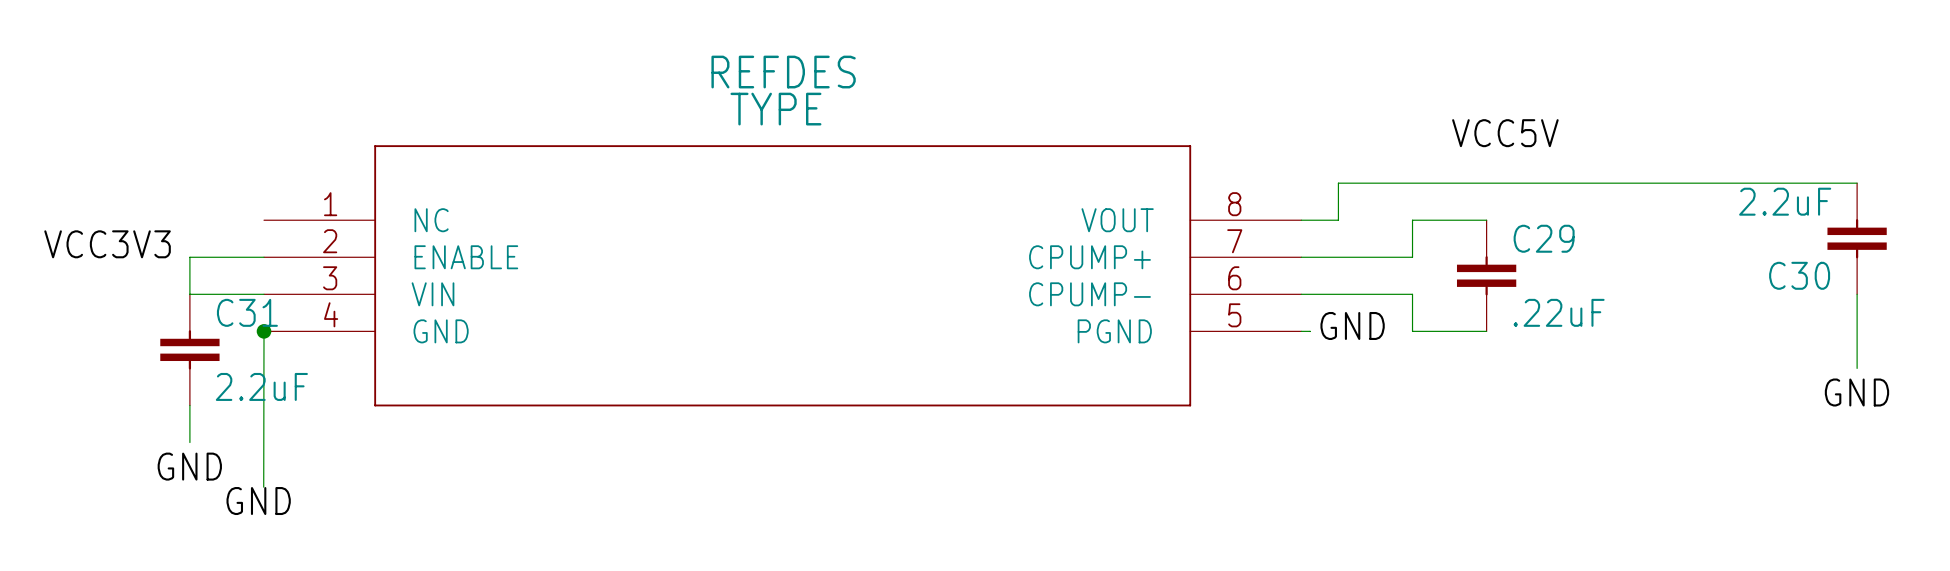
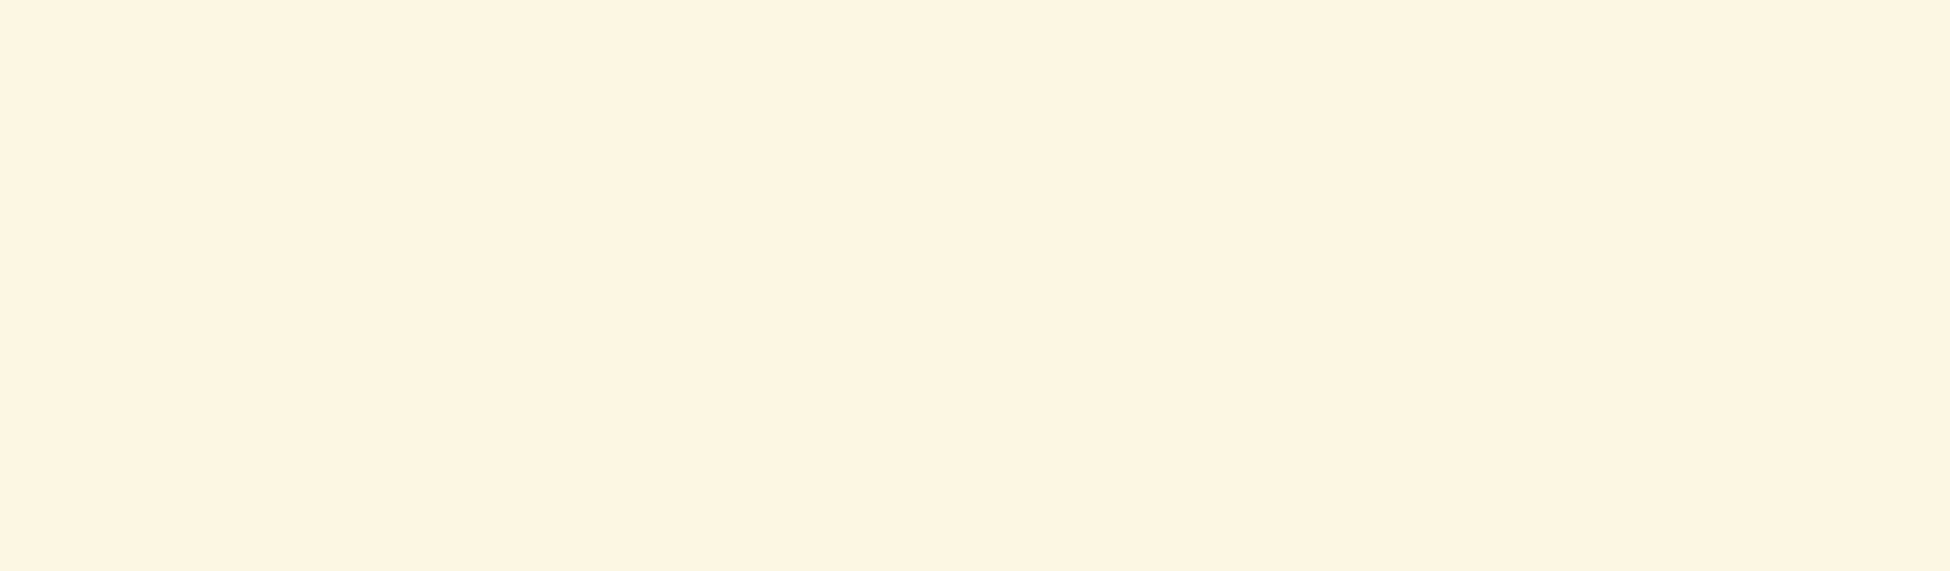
label: VCC5V (1505, 133) -> none
wire: (1857, 183) (1338, 183) (1338, 220) (1301, 220) -> none
wire: (1486, 220) (1412, 220) (1412, 257) (1301, 257) -> none
C30: 2.2uF (1857, 238) -> none
label: VCC3V3 (107, 244) -> none
wire: (264, 257) (189, 257) (189, 294) (264, 294) -> none
part: (782, 275) -> none
C29: .22uF (1486, 275) -> none
wire: (1301, 294) (1412, 294) (1412, 331) (1486, 331) -> none
wire: (1857, 294) (1857, 368) -> none
label: GND (1352, 325) -> none
wire: (264, 331) (263, 487) -> none
junction: (264, 331) -> none
wire: (1301, 331) (1310, 331) -> none
C31: 2.2uF (189, 349) -> none
label: GND (1856, 392) -> none
wire: (189, 405) (189, 442) -> none
label: GND (189, 466) -> none
label: GND (258, 501) -> none

